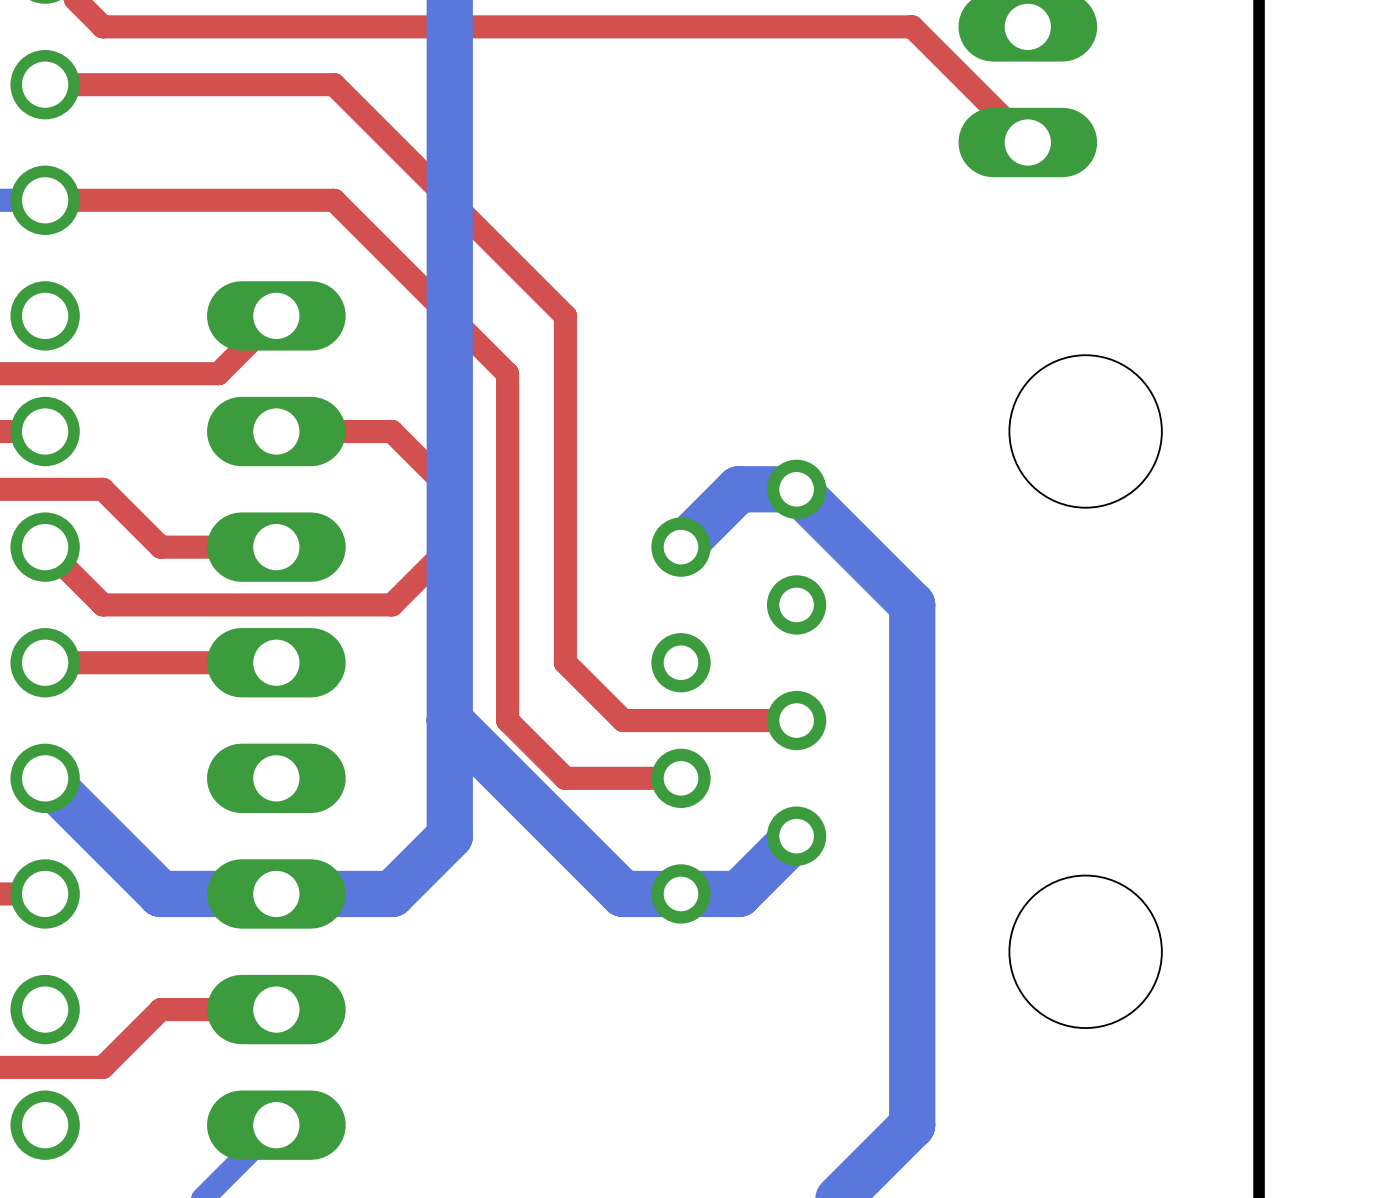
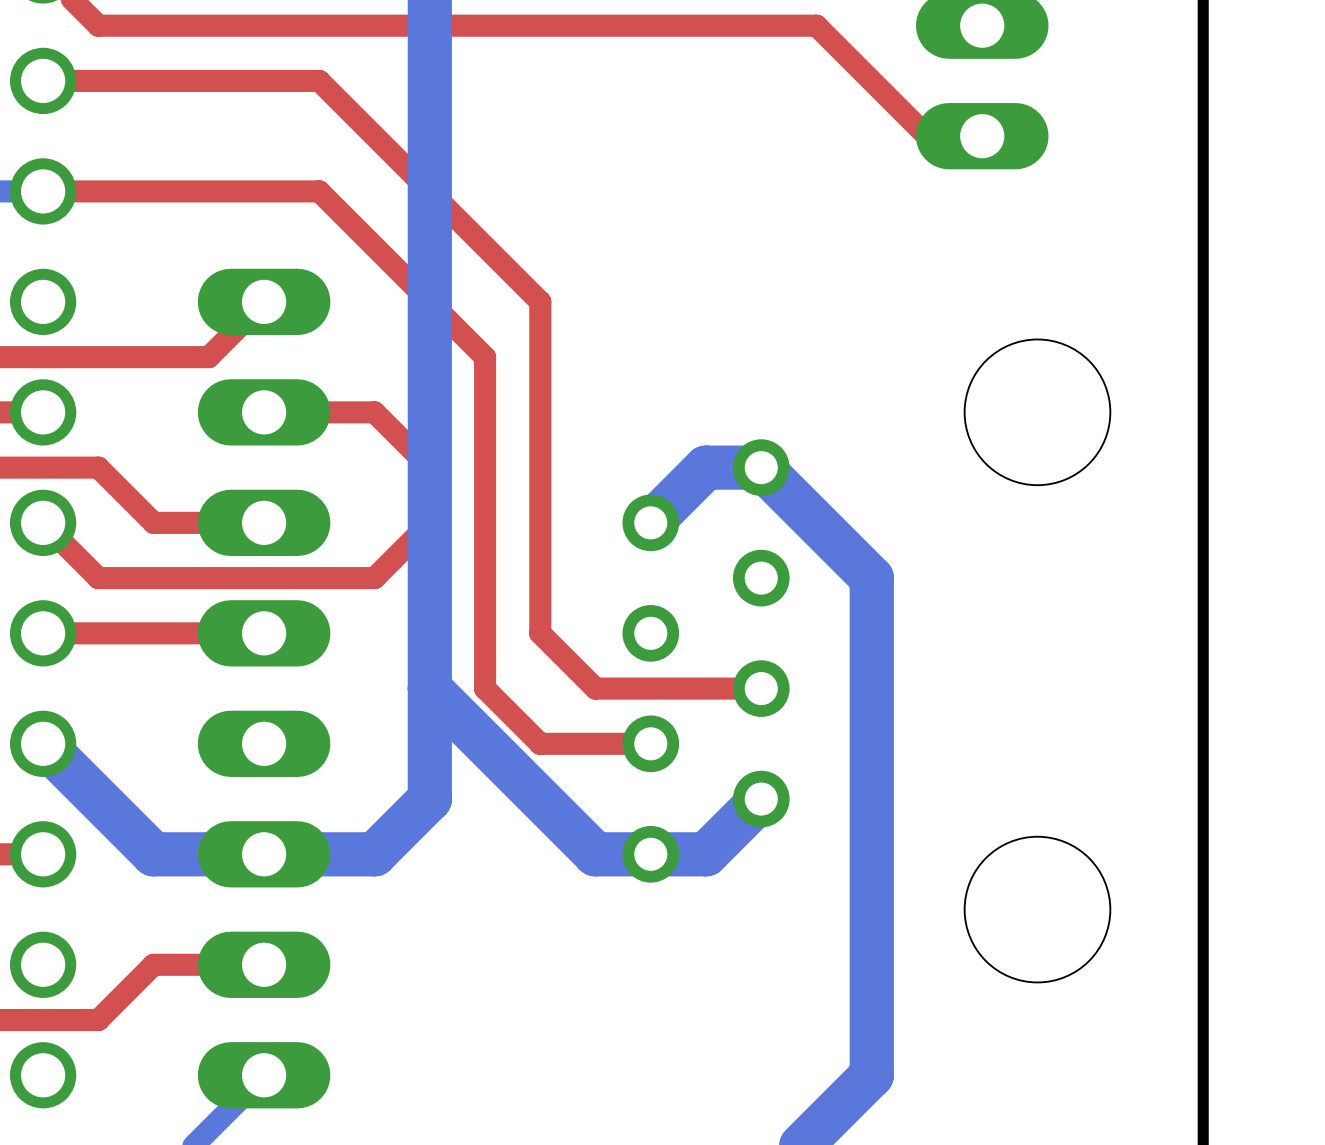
top track: (854, 26) (912, 26) (1027, 142) -> (816, 25) (927, 136) (982, 136)

